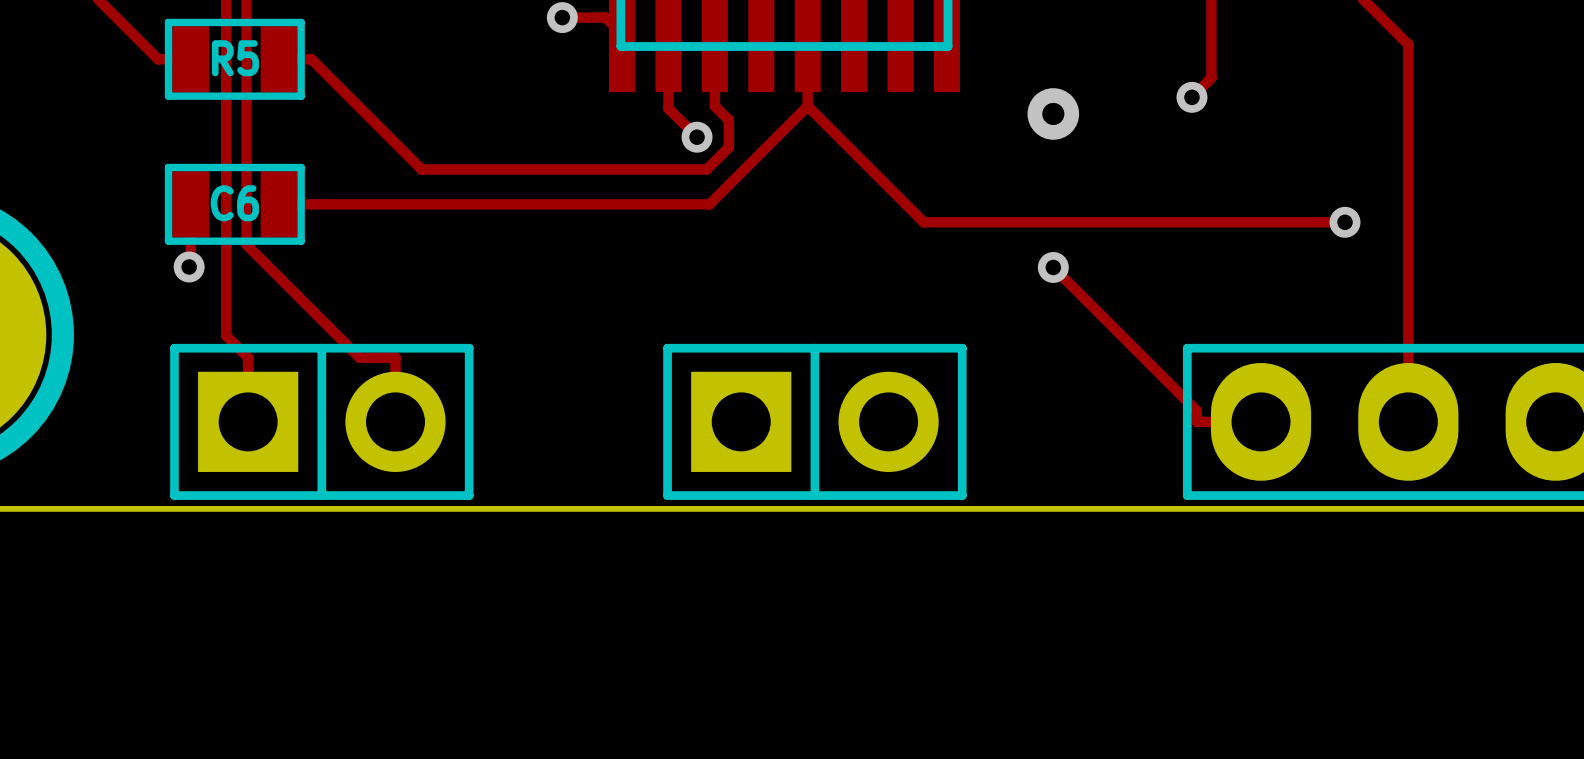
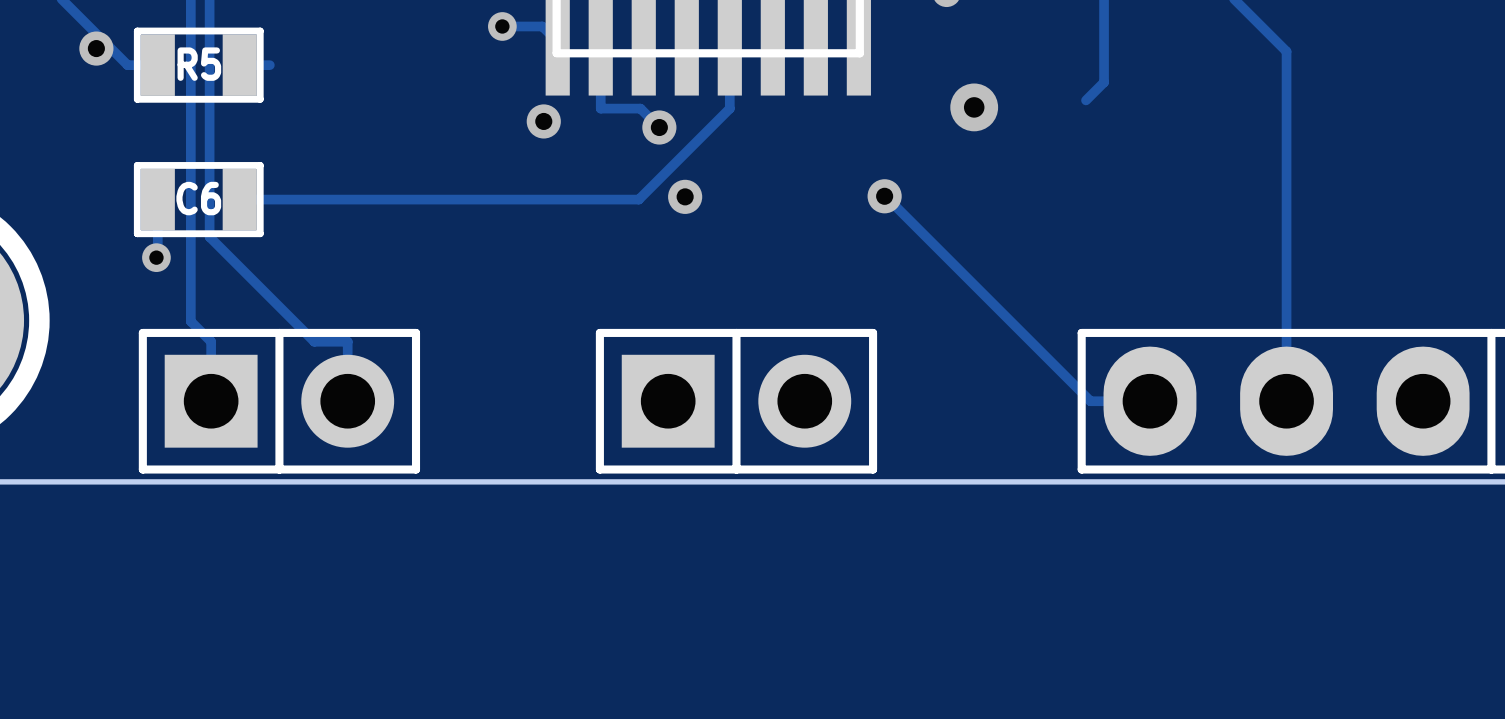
track: (714, 34) (714, 106) (728, 120) (728, 147) (706, 169) (421, 169) (311, 59) -> none
via: none -> (96, 48)
via: (1191, 97) -> none
track: (668, 106) (668, 108) (697, 137) -> (600, 108) (640, 108) (659, 127)
track: (807, 106) (923, 222) (1345, 222) -> none
via position: (1053, 113) -> (974, 107)
via: none -> (543, 121)
via: none -> (659, 127)
via: (697, 137) -> none
via: none -> (884, 196)
via: none -> (685, 196)
via: (1345, 222) -> none
track: (1053, 267) (1196, 410) (1196, 421) -> (885, 196) (1090, 401)
via: (1053, 267) -> none

